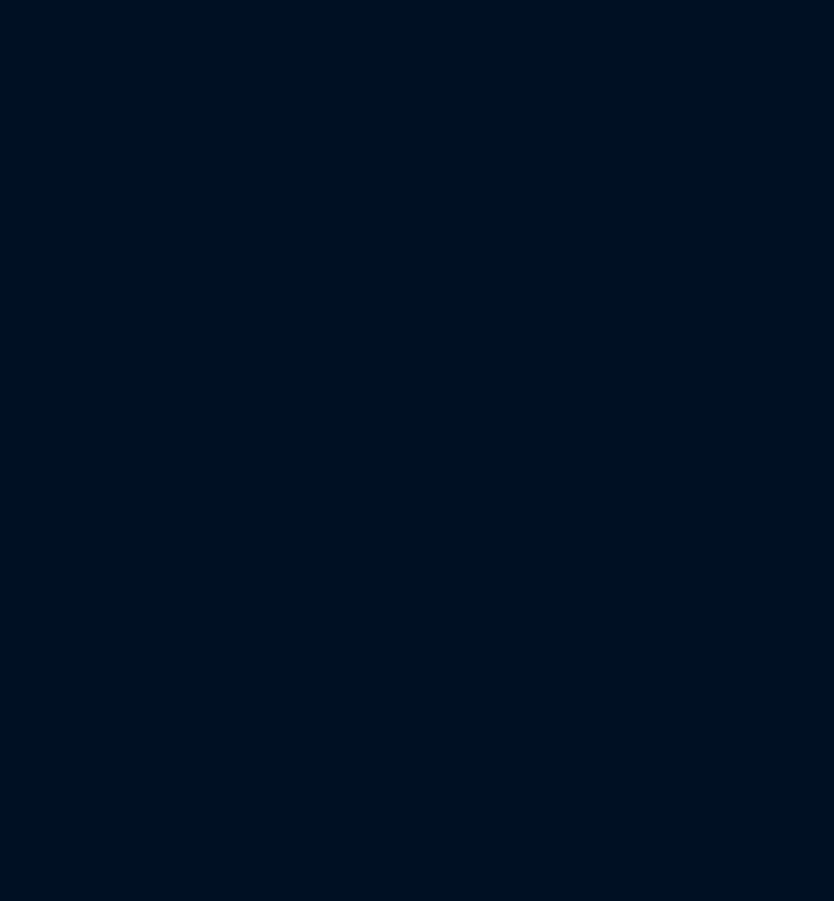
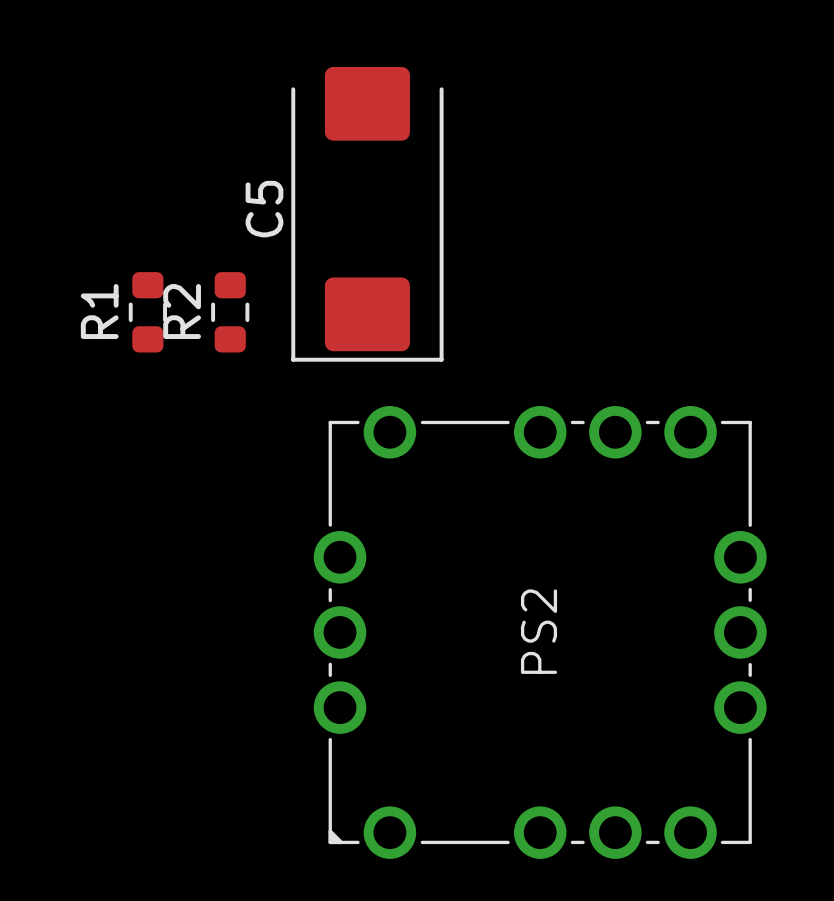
C5: none -> (367, 214)
R1: none -> (147, 312)
R2: none -> (230, 312)
PS2: none -> (540, 632)

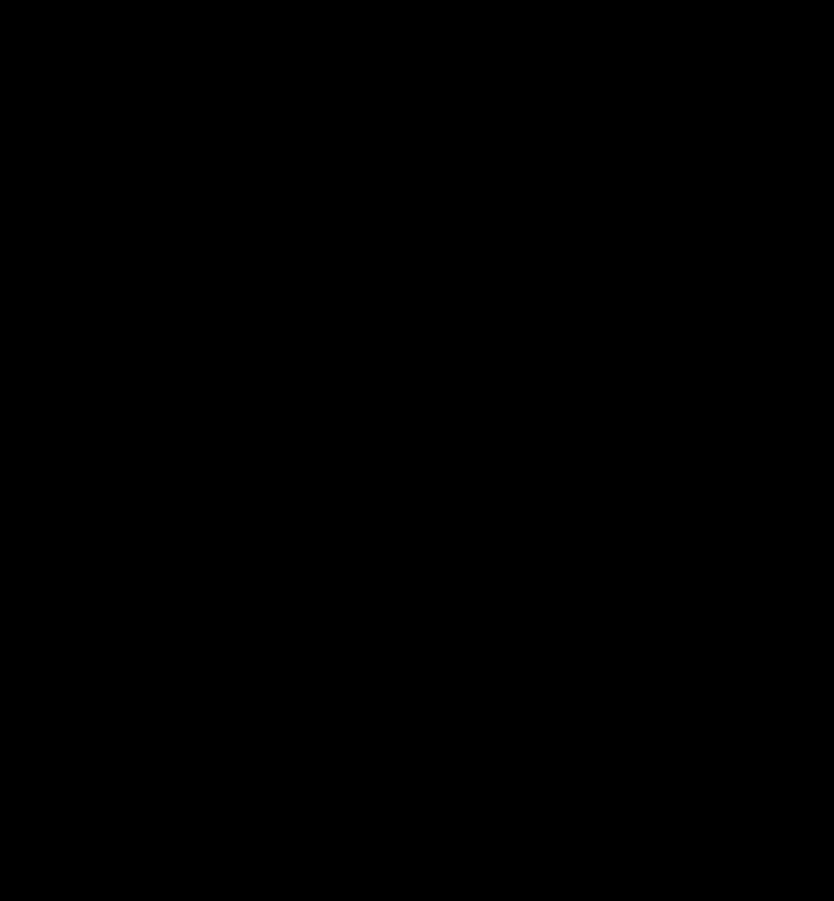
C5: (367, 214) -> none
R1: (147, 312) -> none
R2: (230, 312) -> none
PS2: (540, 632) -> none

